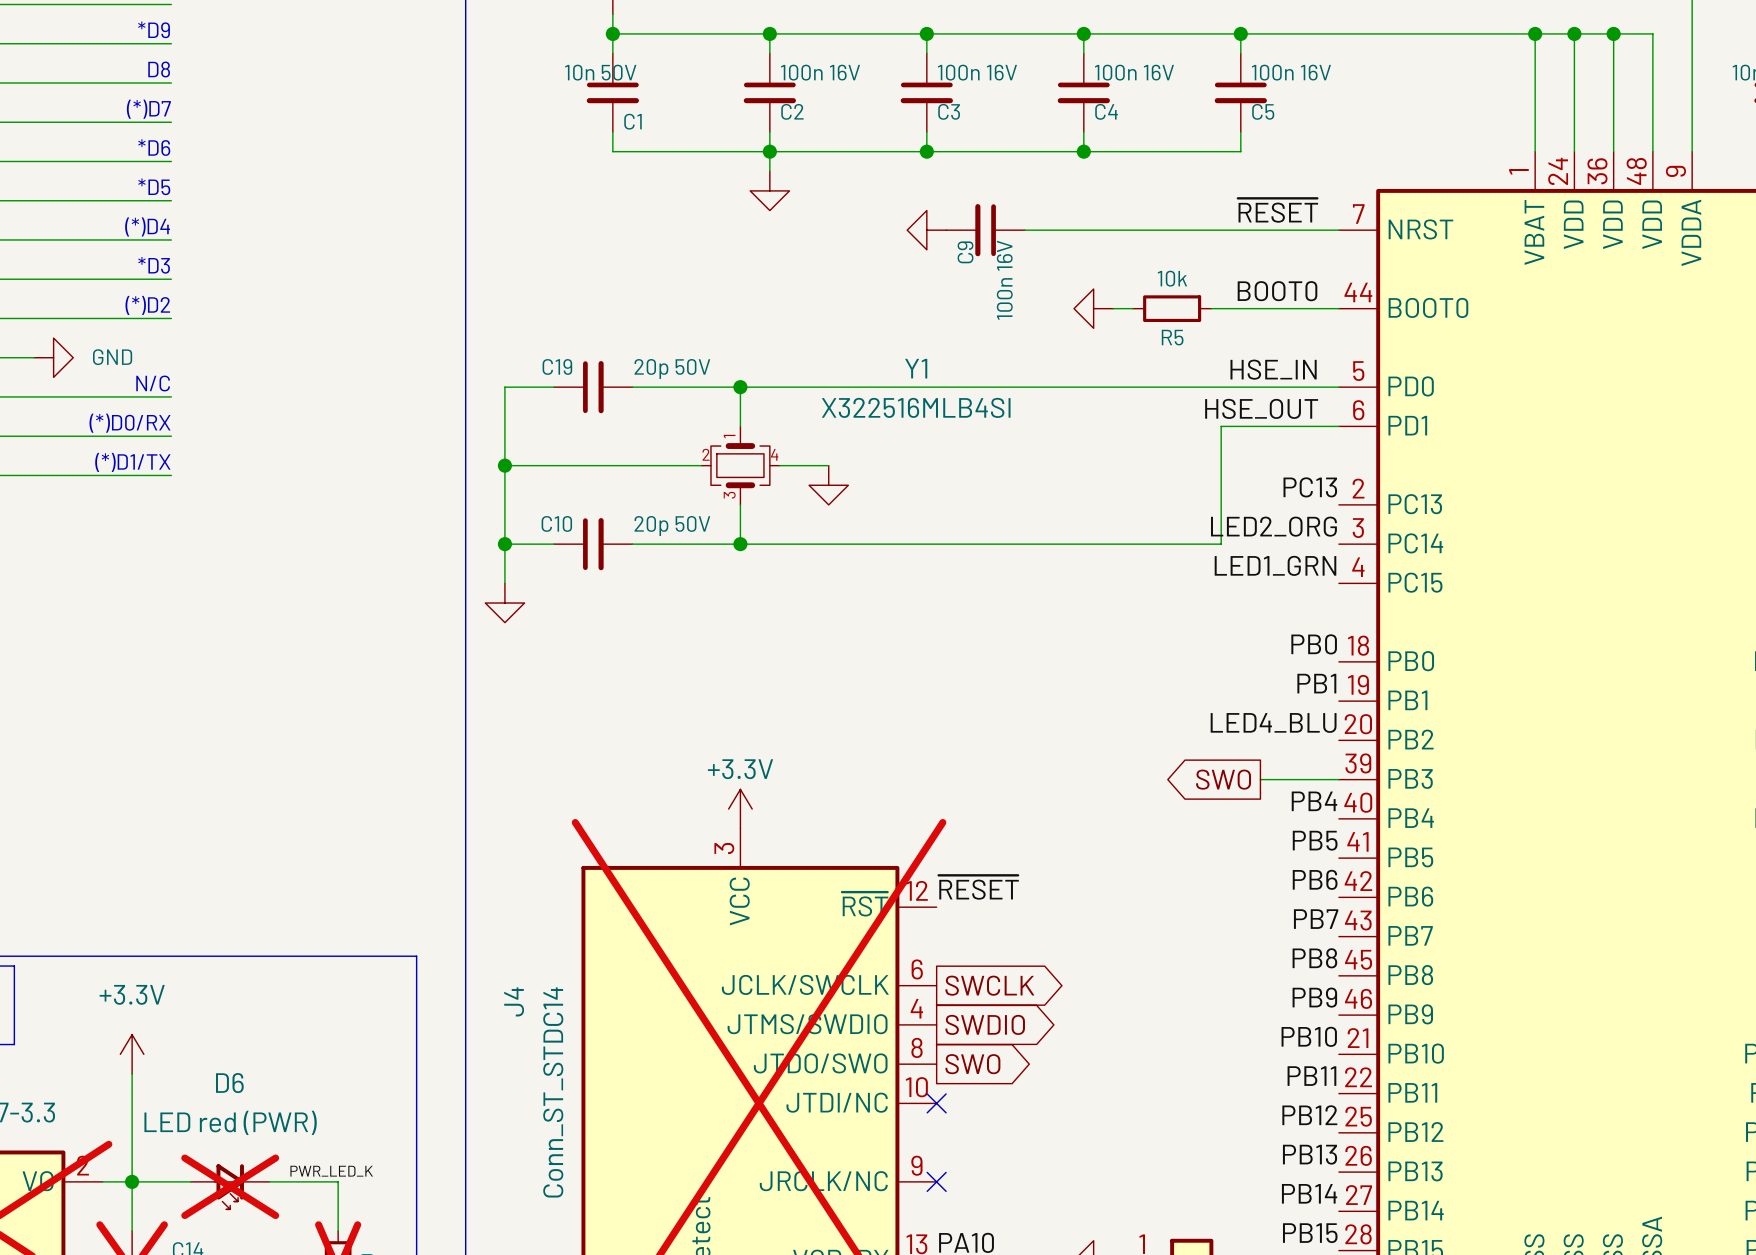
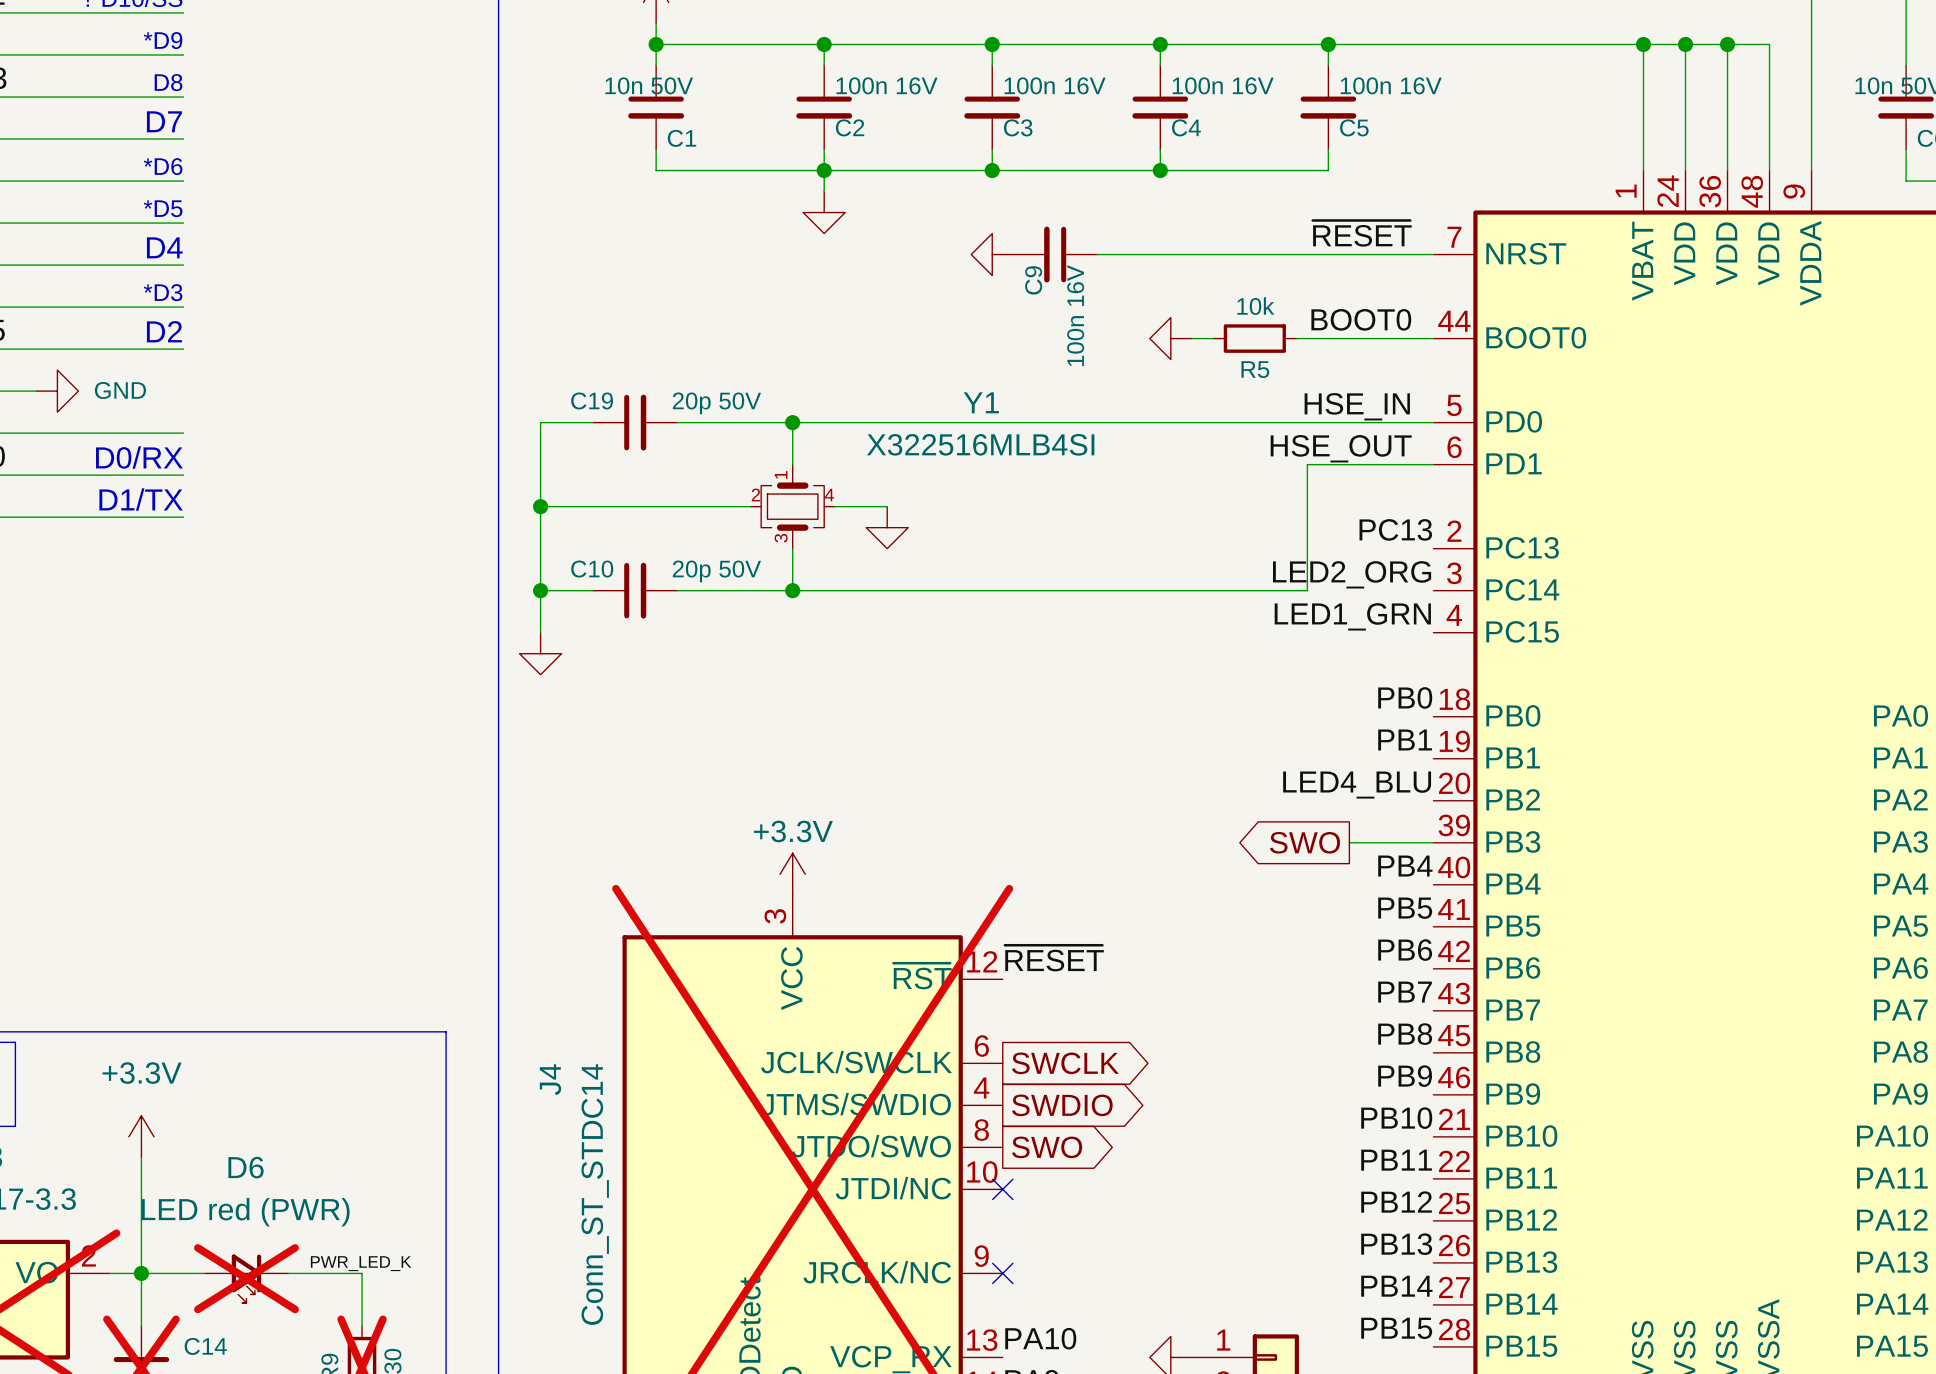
text: (*)D7 (148, 109) -> D7 (164, 121)
text: (*)D4 (147, 226) -> D4 (164, 247)
text: (*)D2 (147, 305) -> D2 (164, 331)
text: N/C (153, 383) -> none
text: (*)D0/RX (130, 423) -> D0/RX (139, 457)
text: (*)D1/TX (132, 462) -> D1/TX (141, 499)

